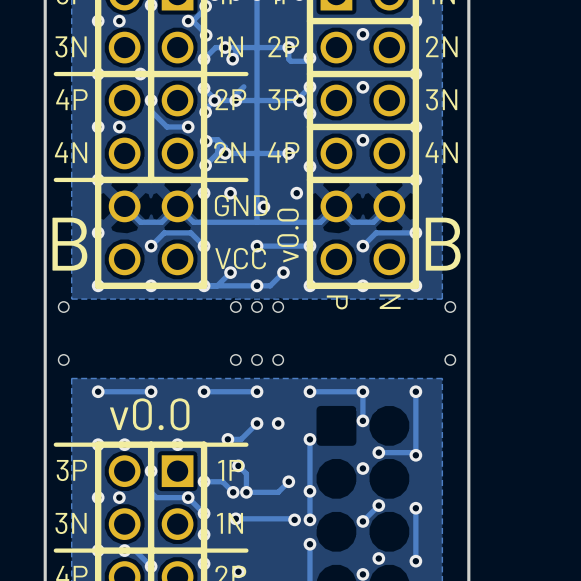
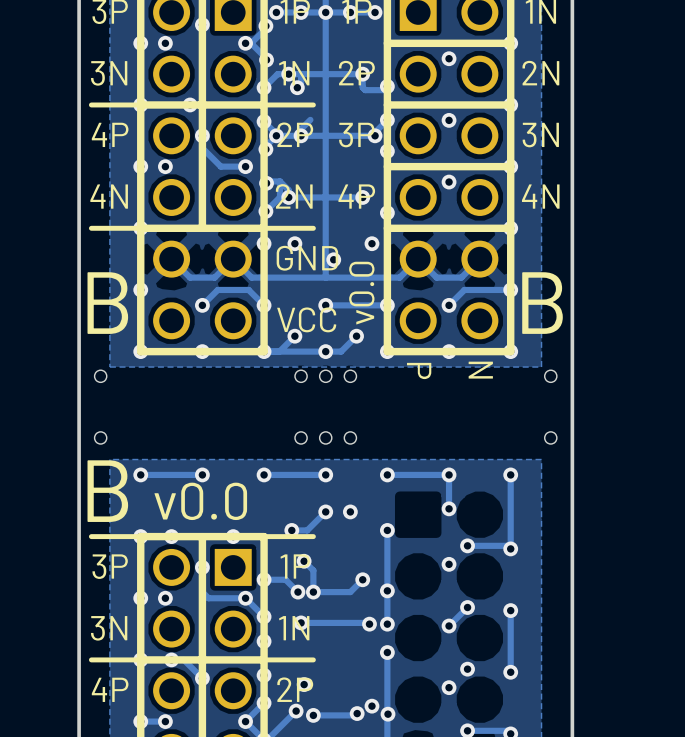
text: none -> B (107, 491)

